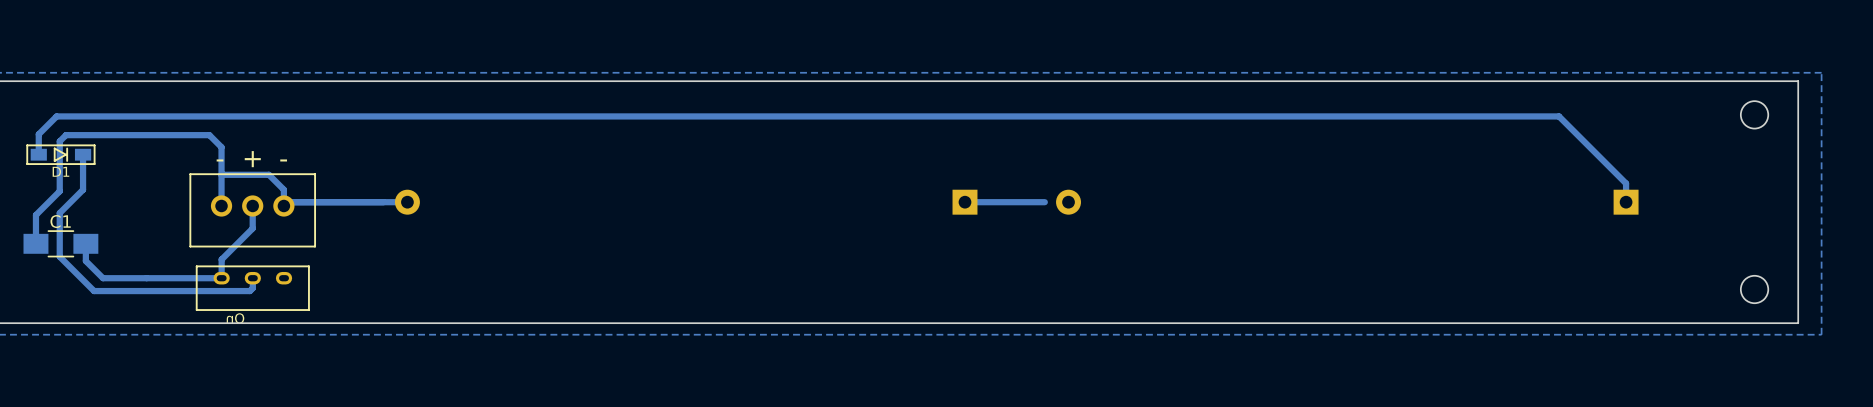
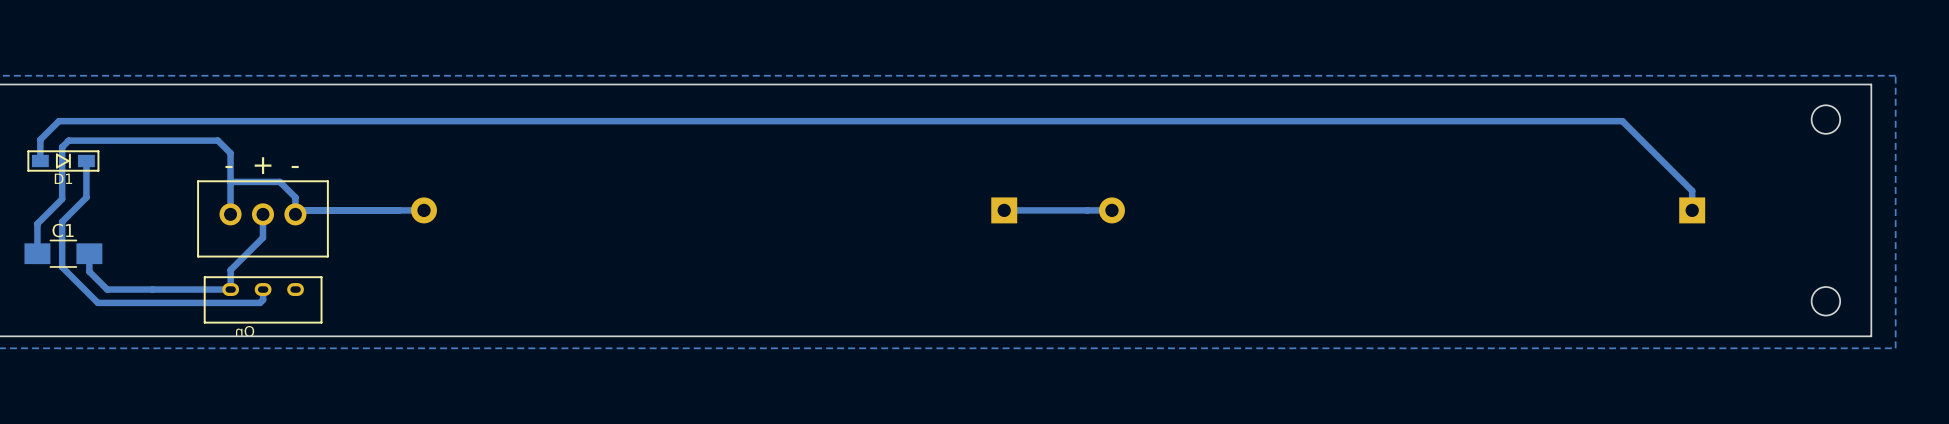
track: none -> (1098, 210) (1087, 210)

